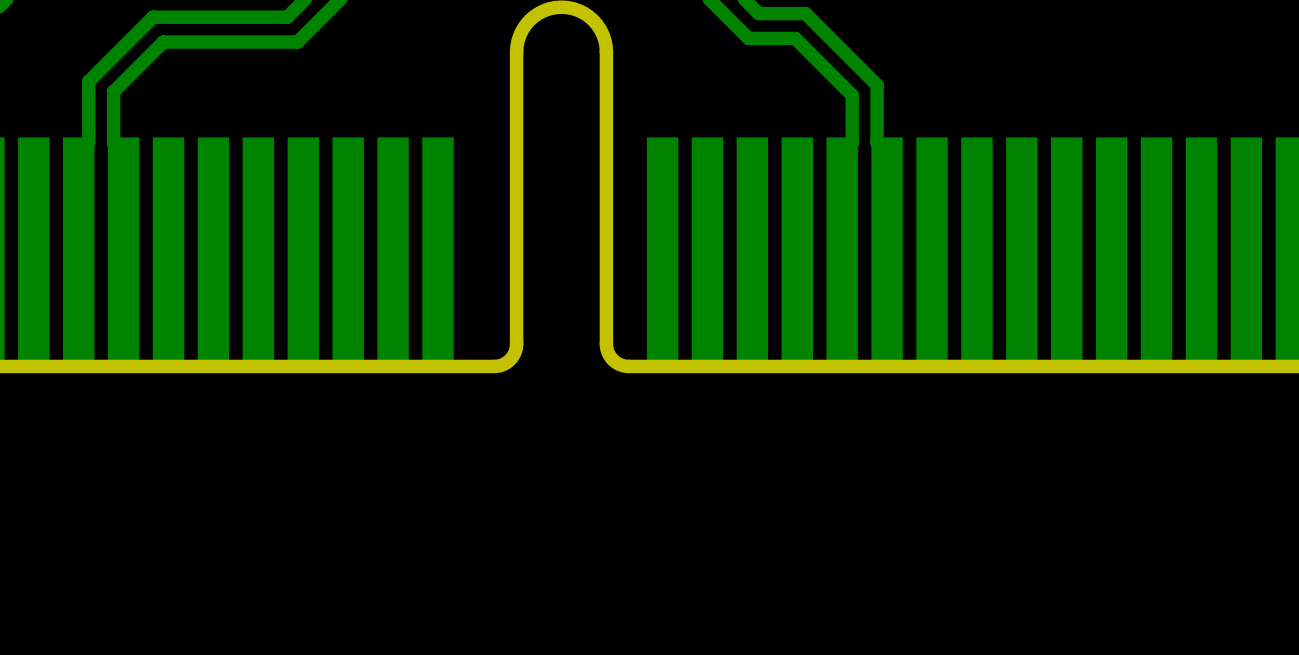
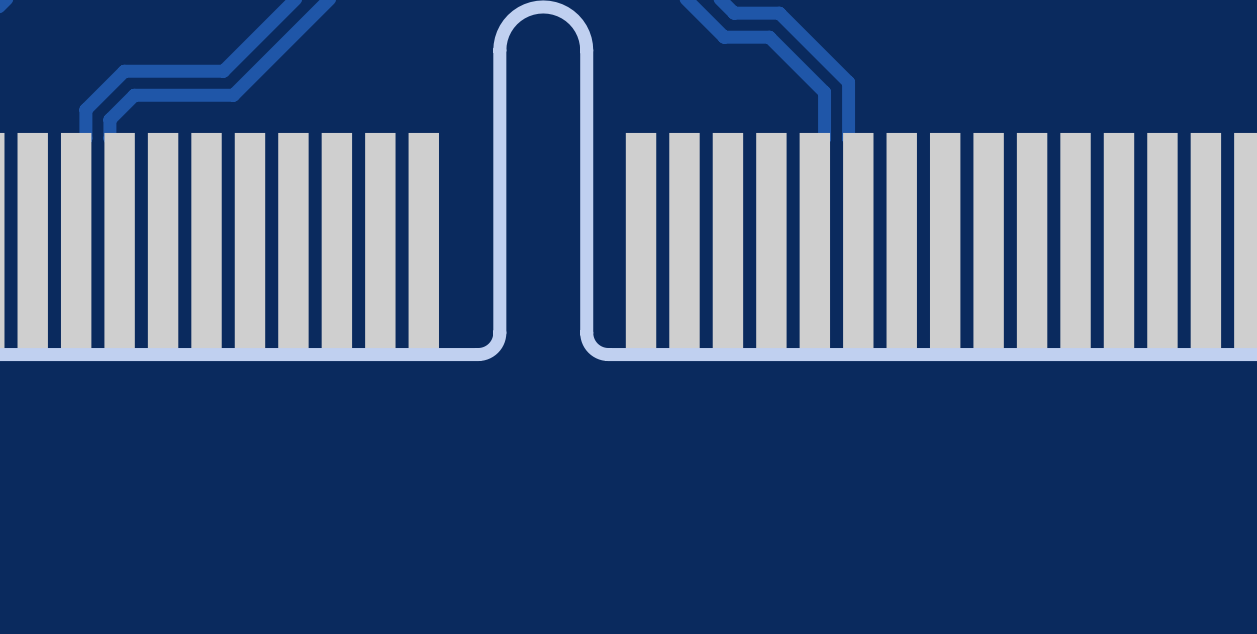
track: (287, 17) (153, 17) (88, 81) (88, 113) -> (278, 16) (223, 71) (124, 71) (85, 109)
track: (297, 42) (163, 42) (113, 91) (113, 123) -> (288, 40) (233, 95) (134, 95) (109, 119)

